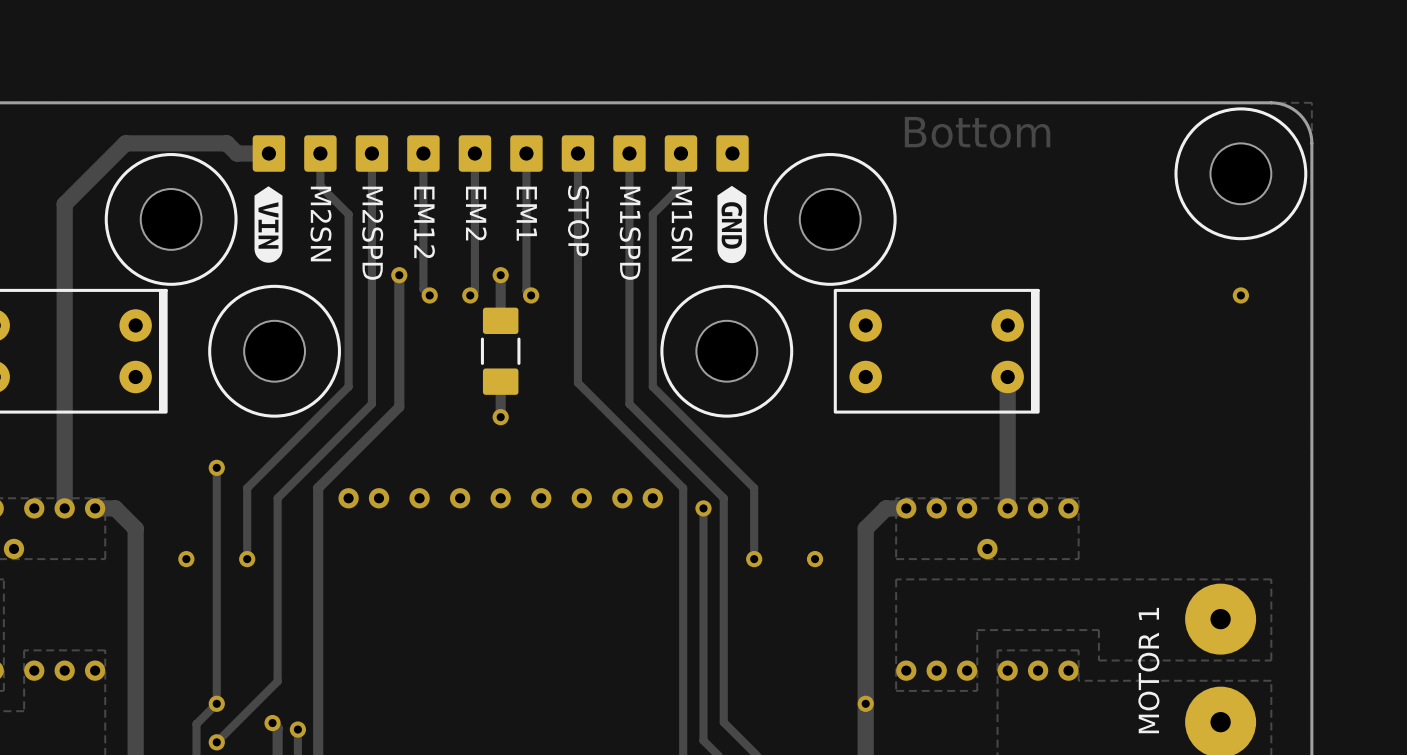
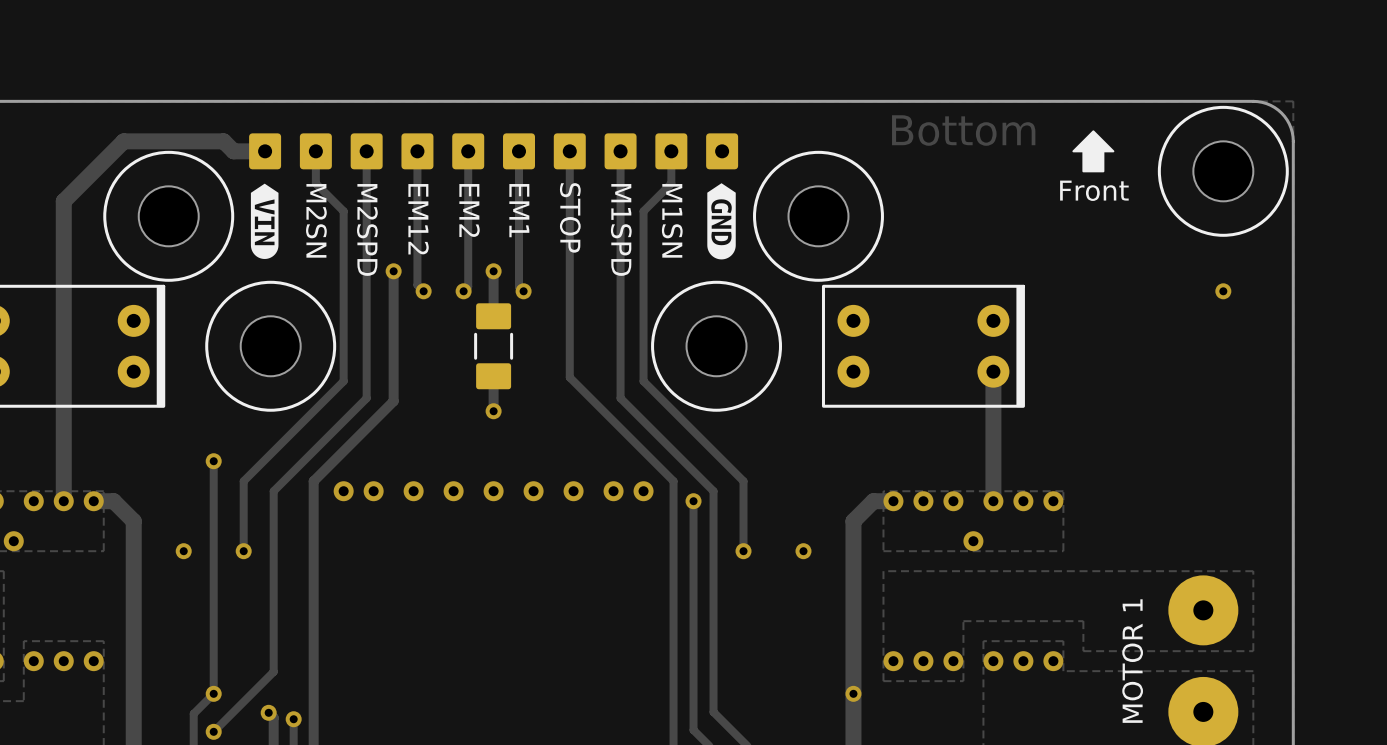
drawing: none -> [1072, 130, 1115, 173]
text: none -> Front (1094, 190)

